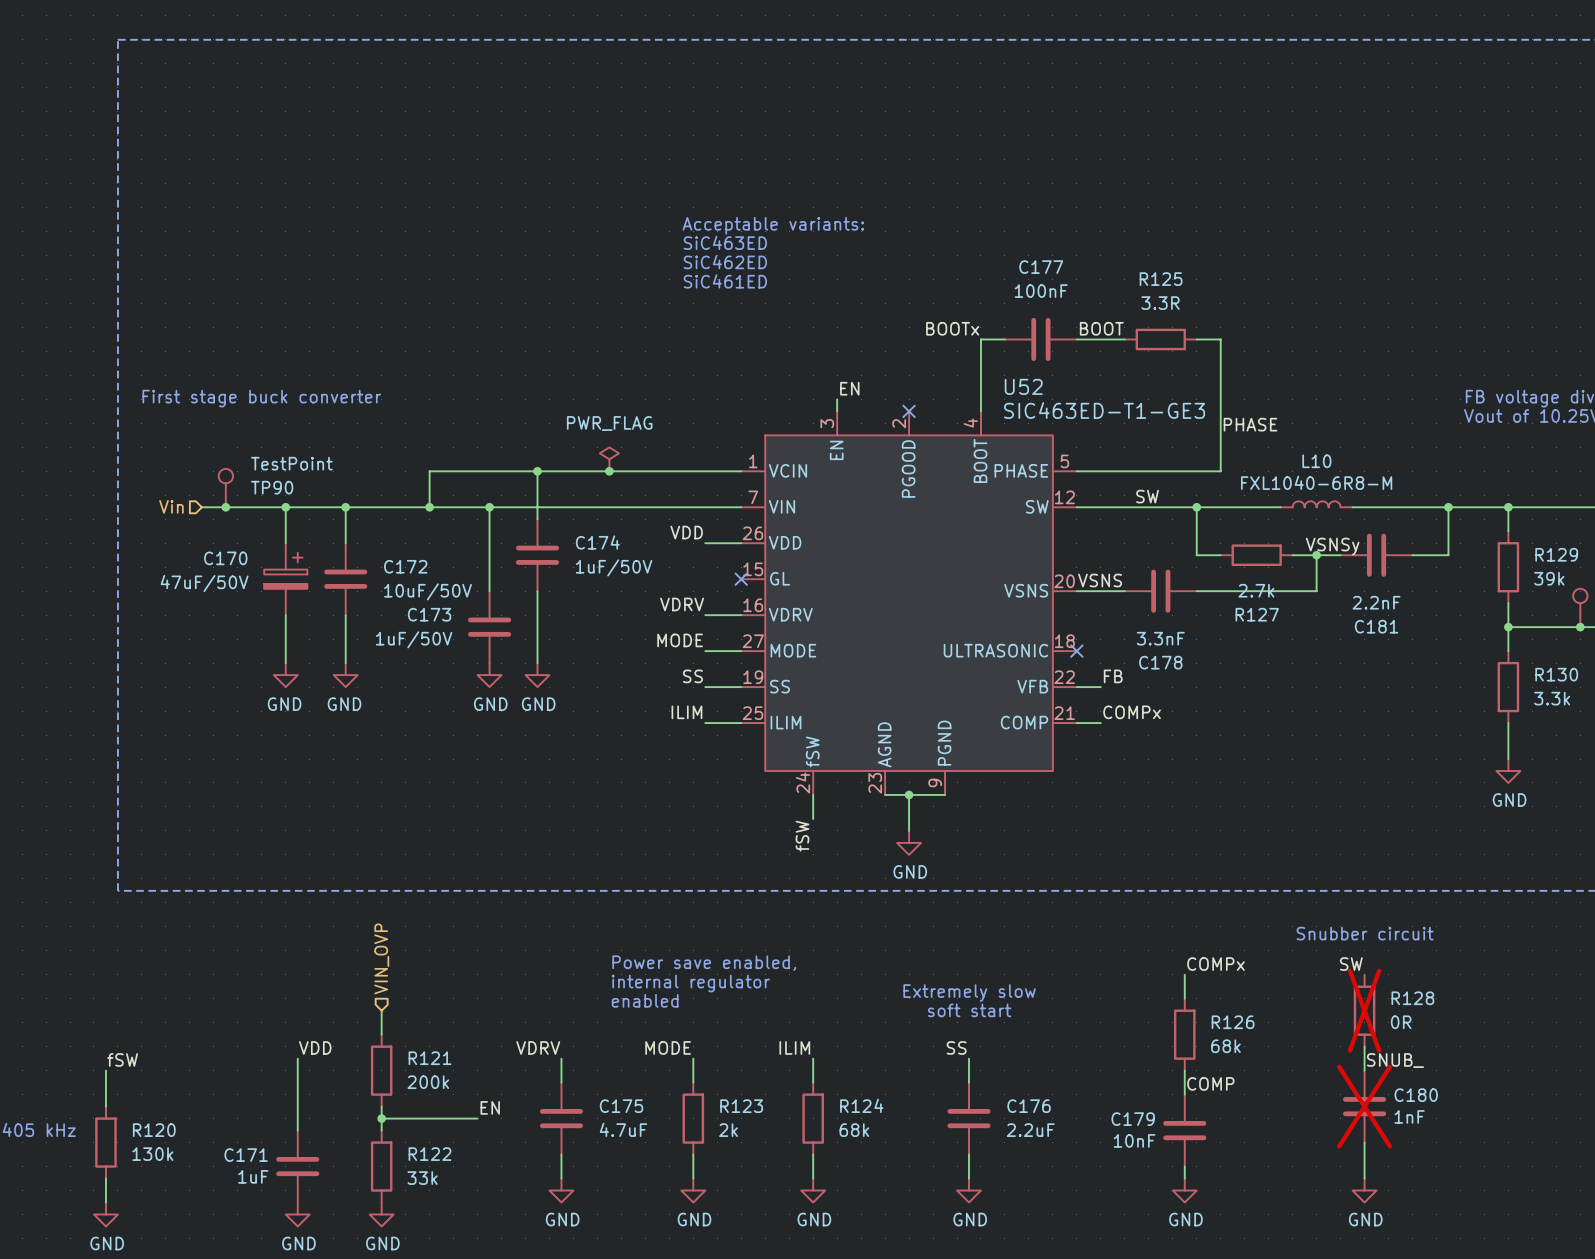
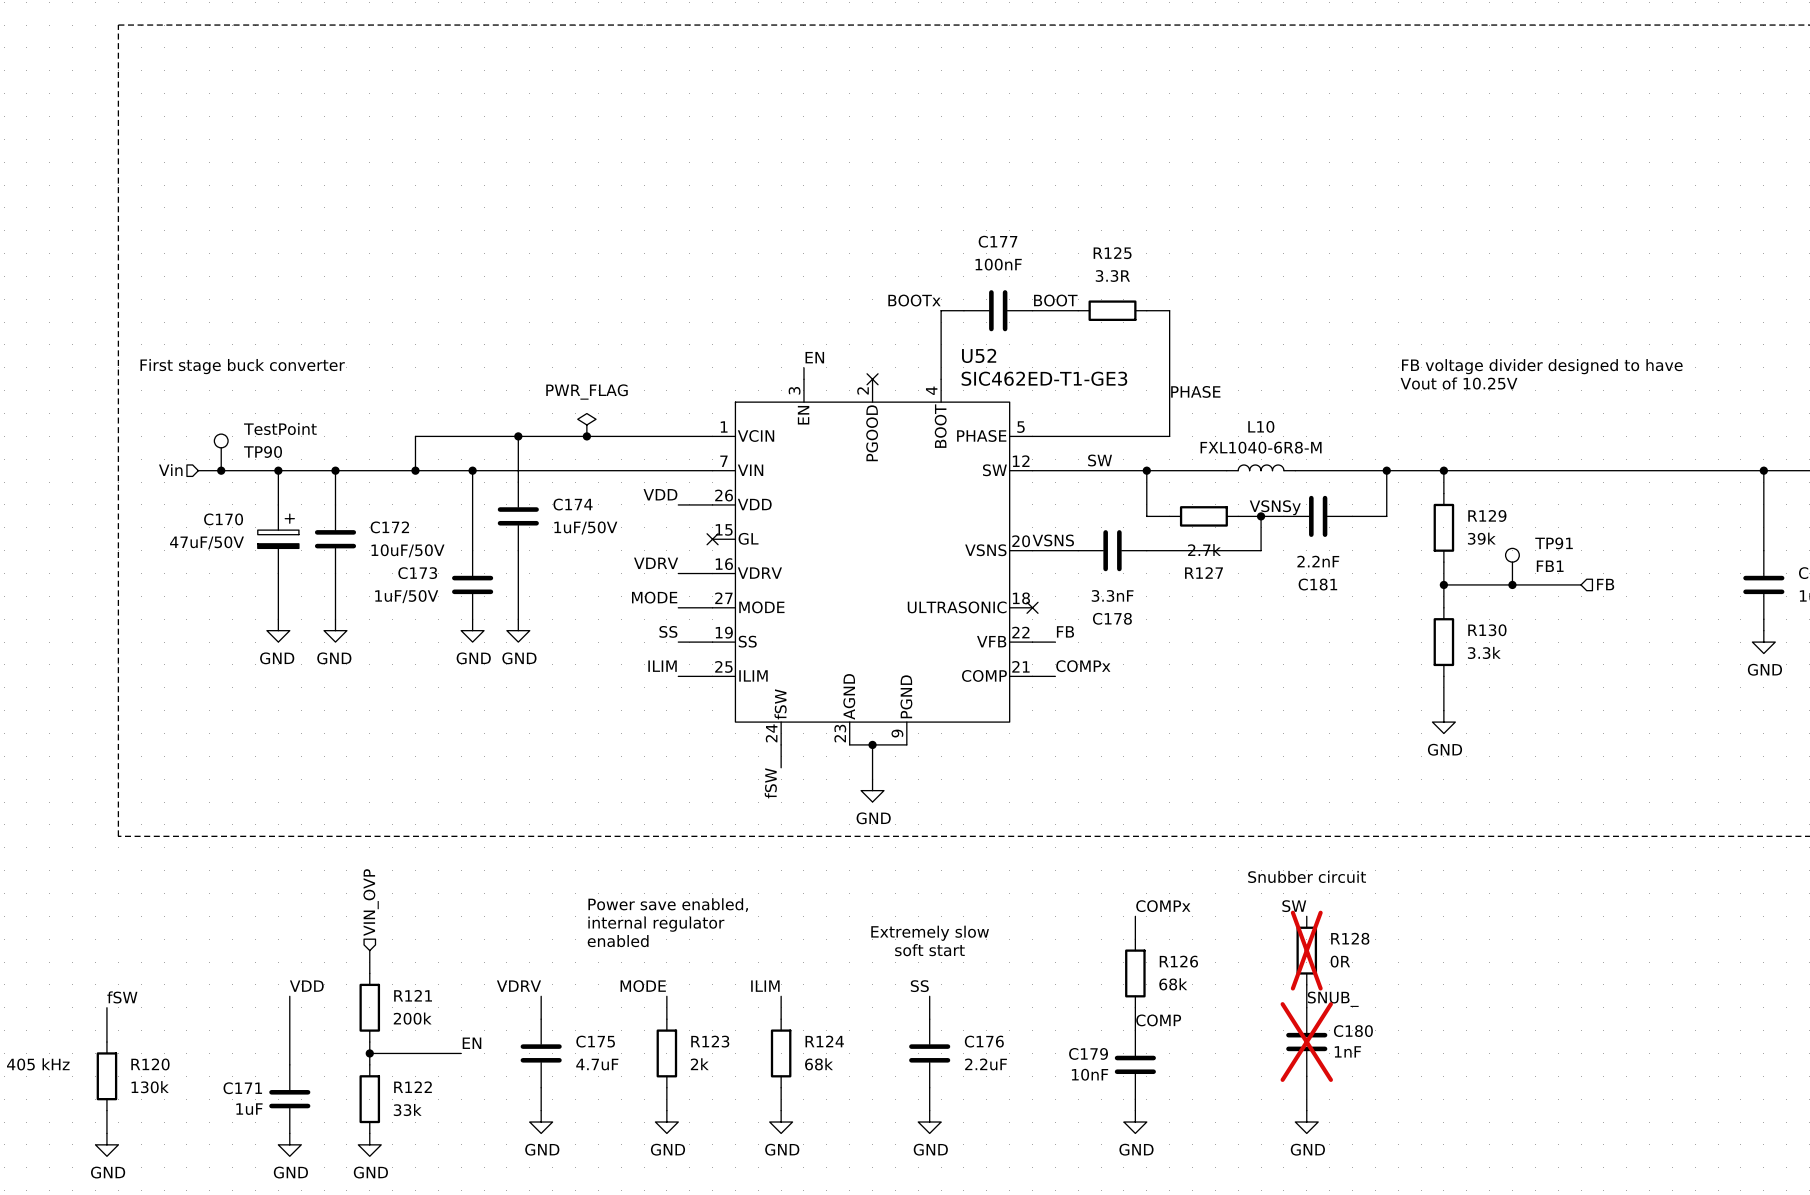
text: Acceptable variants: (773, 225) -> none
text: SiC463ED (725, 242) -> none
text: SiC462ED (725, 262) -> none
text: SiC461ED (725, 281) -> none
U52 value: SIC463ED-T1-GE3 (1104, 410) -> SIC462ED-T1-GE3 (1044, 378)

